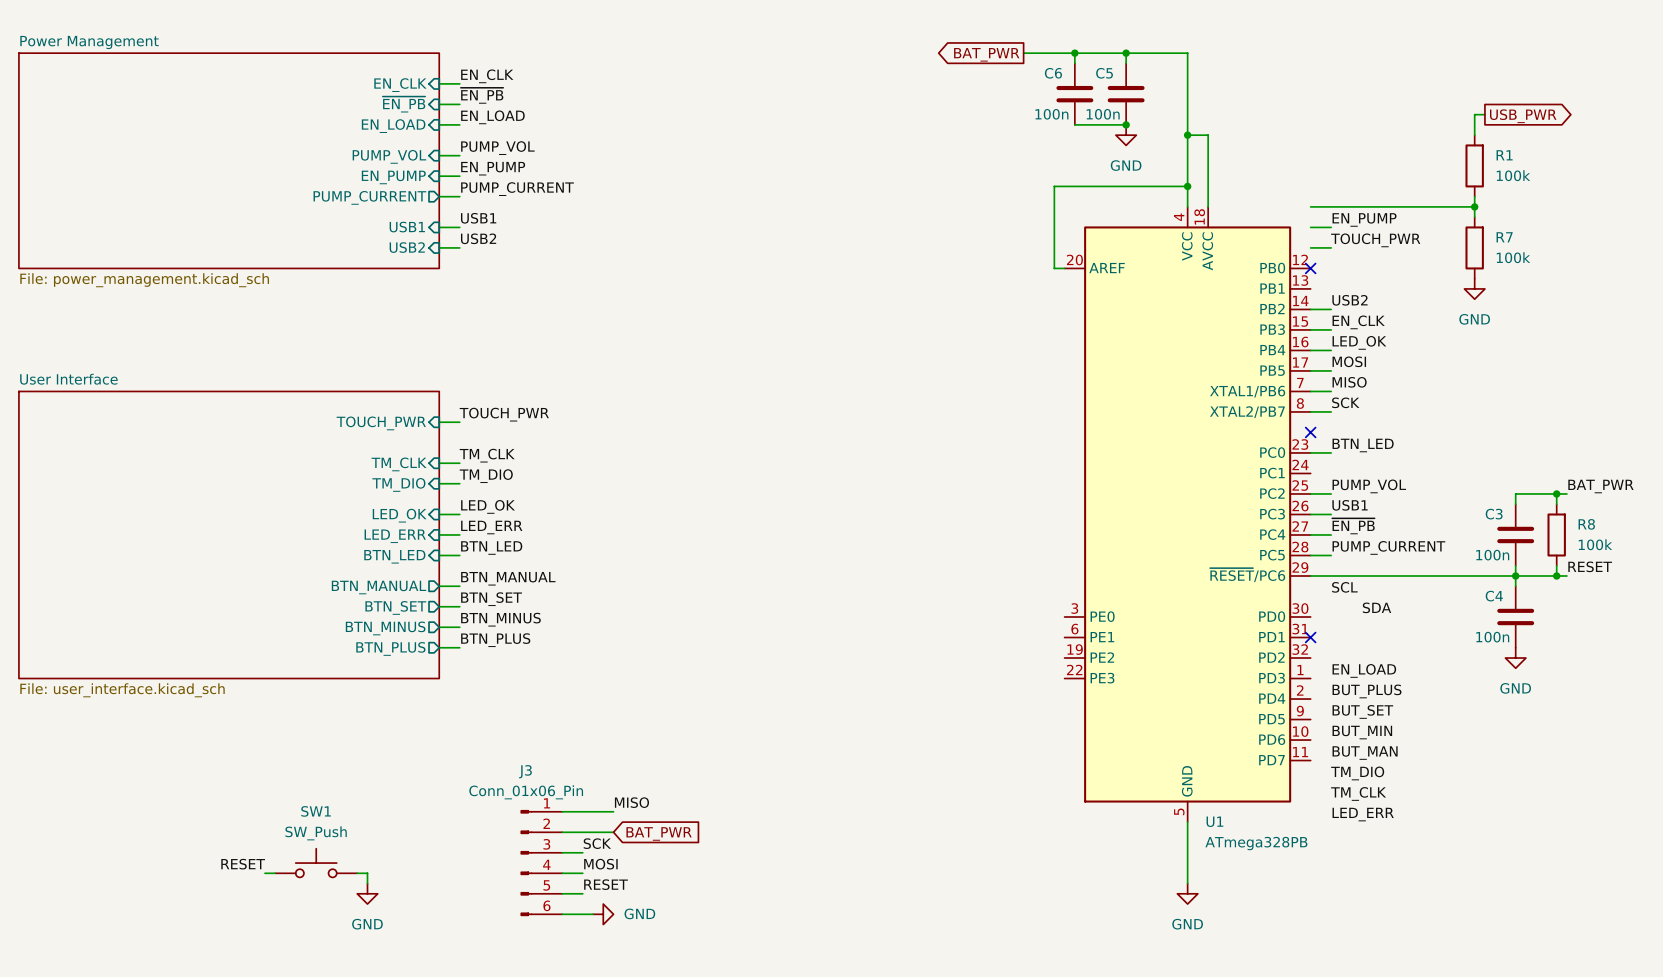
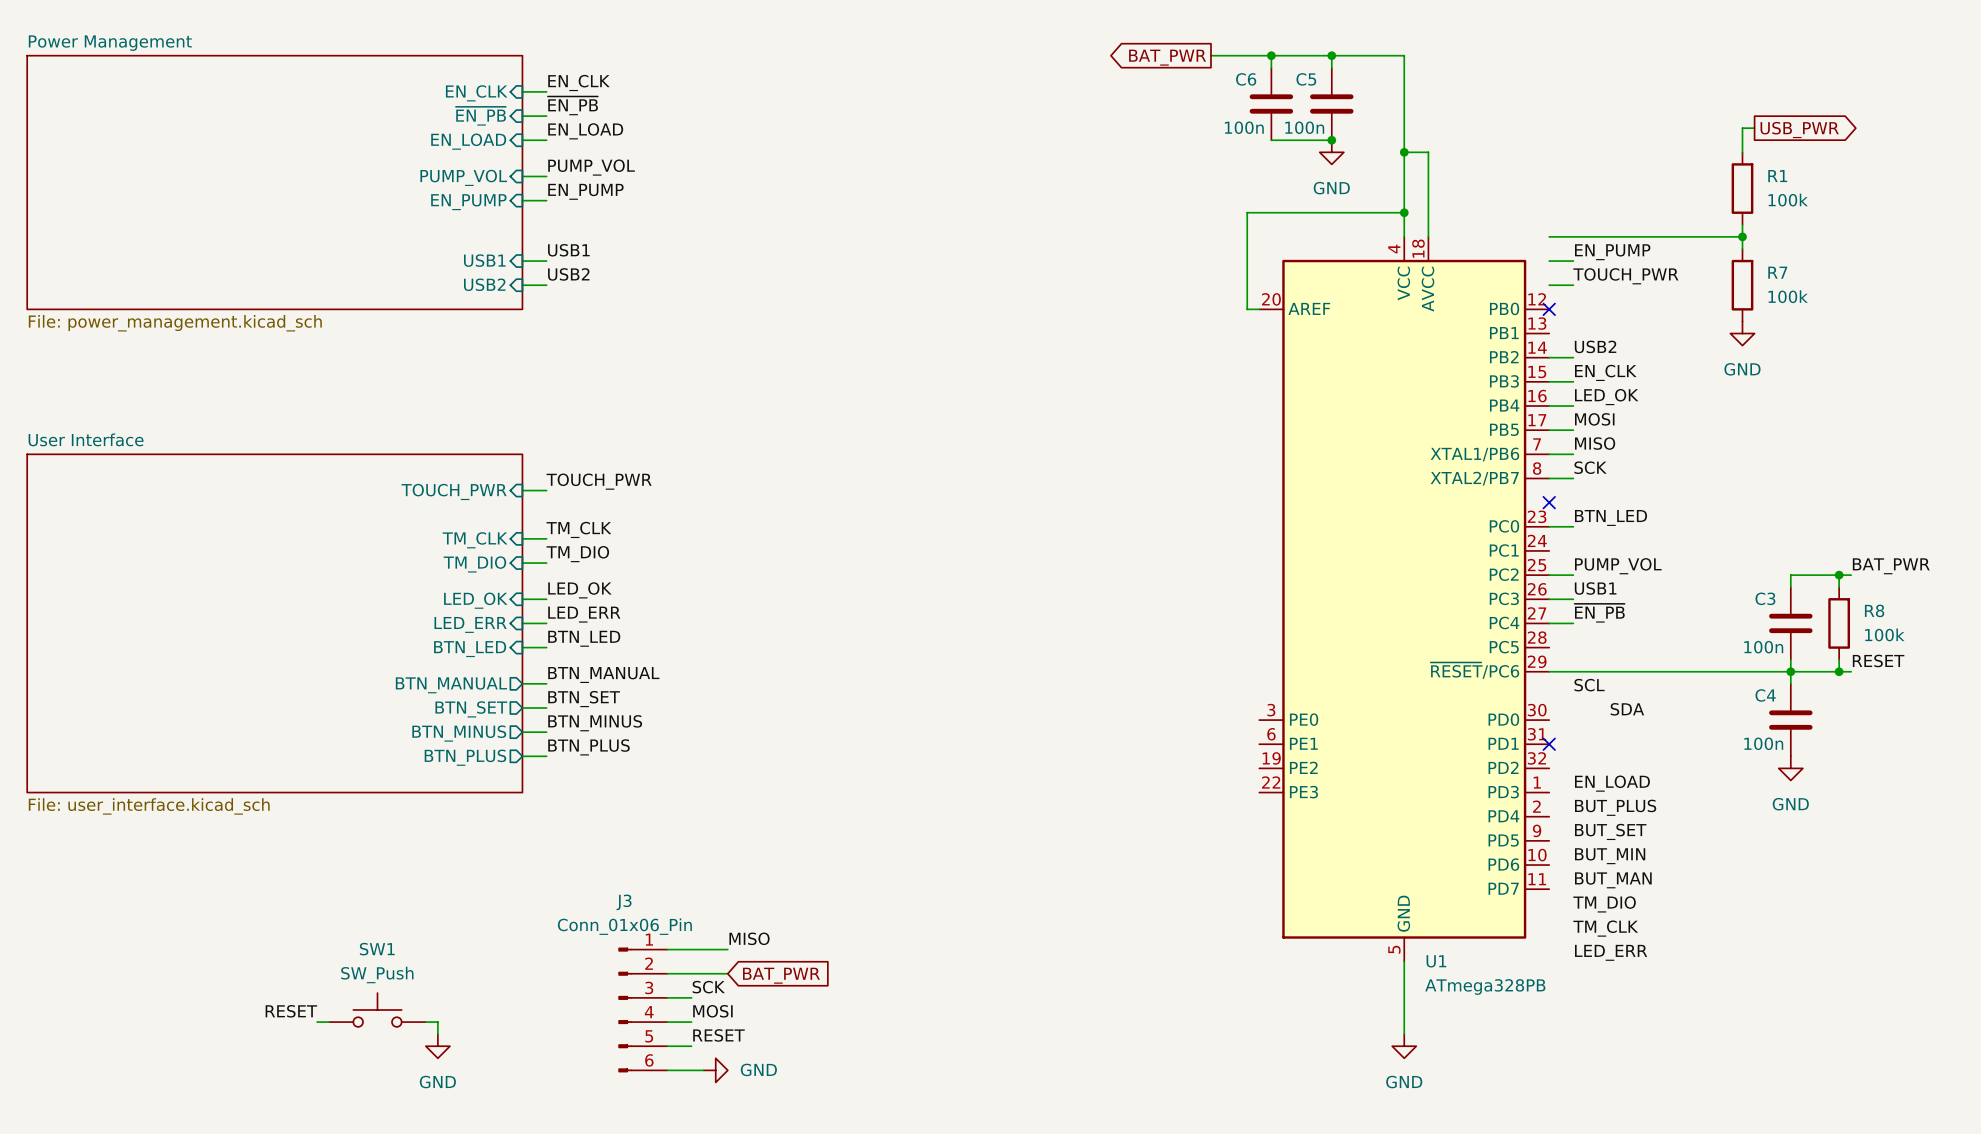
label: PUMP_CURRENT (517, 189) -> none
wire: (439, 196) (459, 196) -> none
sheet pin: PUMP_CURRENT (369, 197) -> none
label: PUMP_CURRENT (1388, 547) -> none
wire: (1310, 555) (1331, 555) -> none

